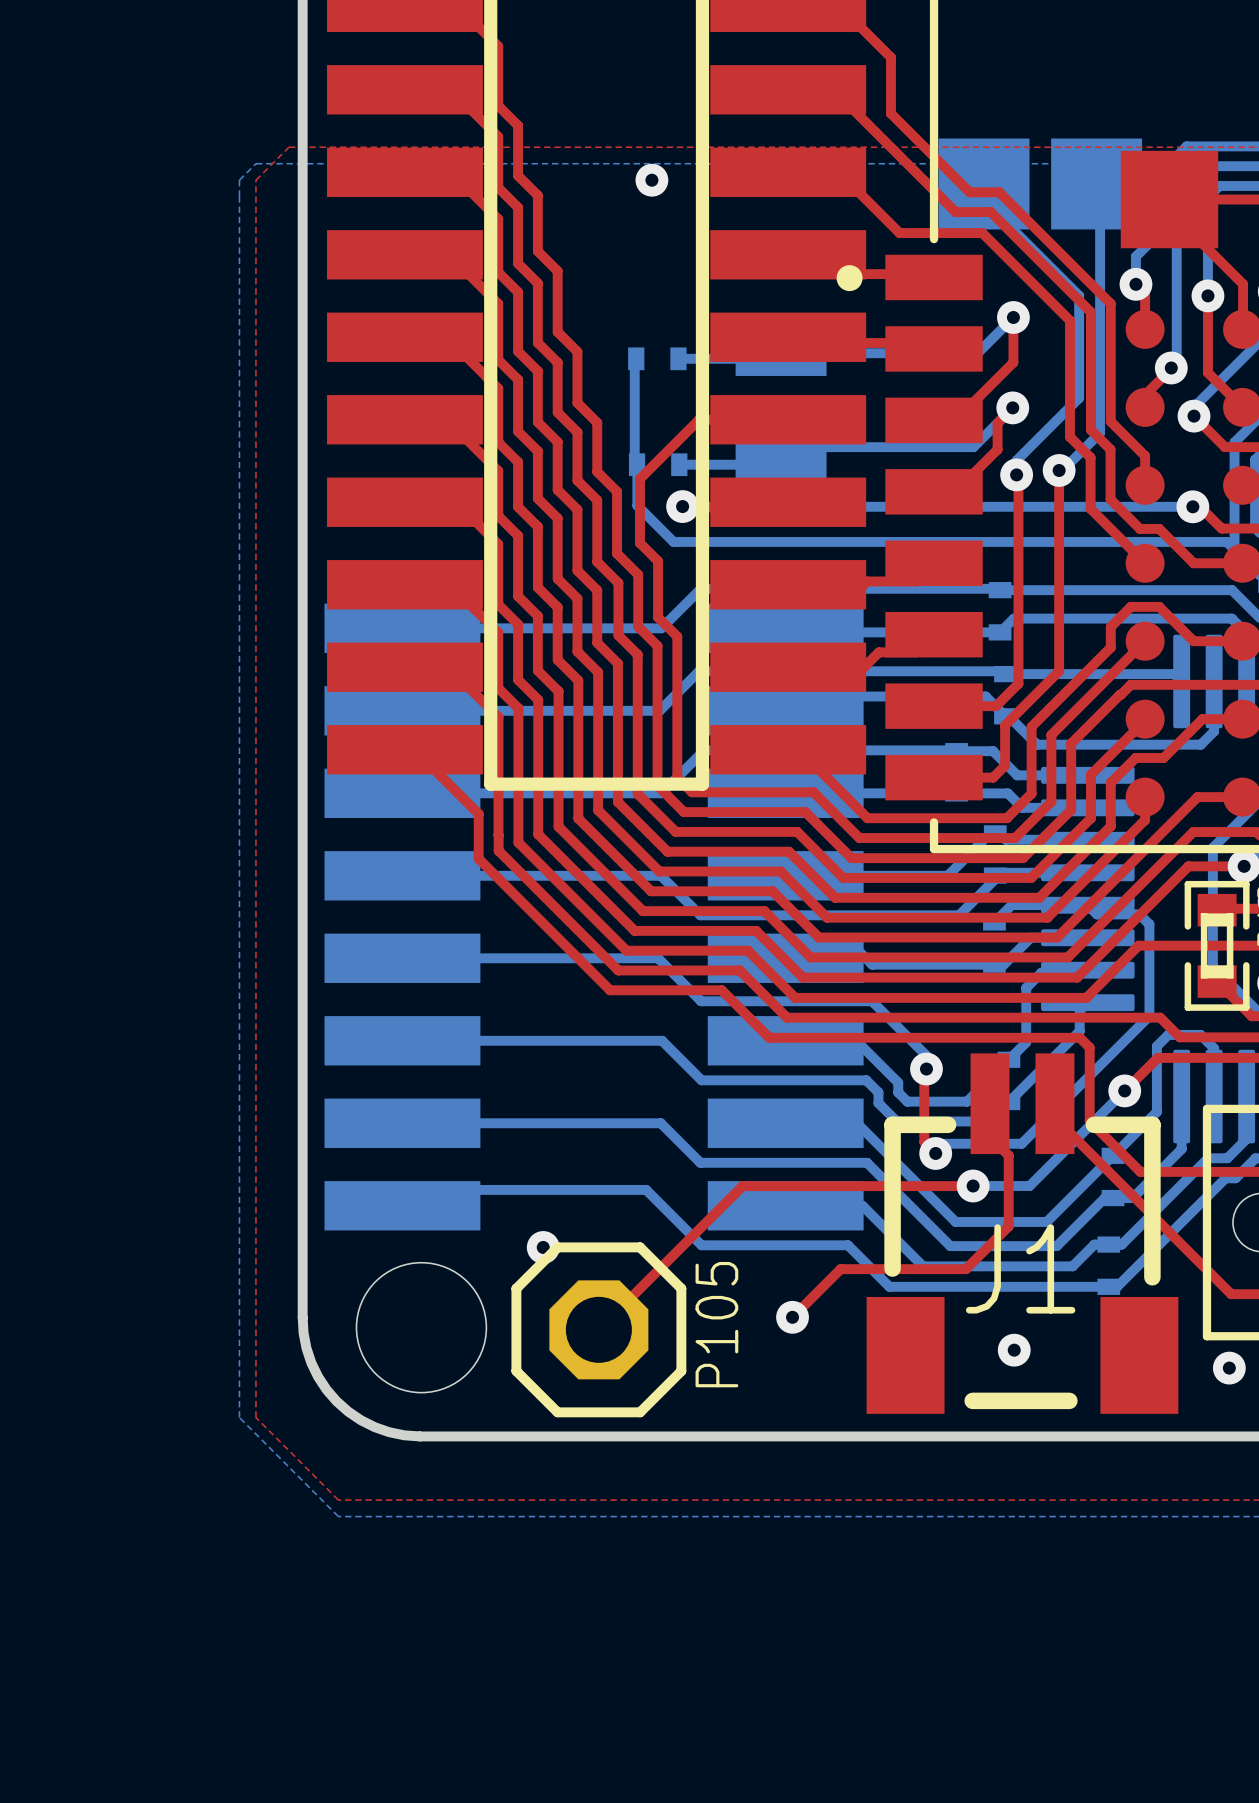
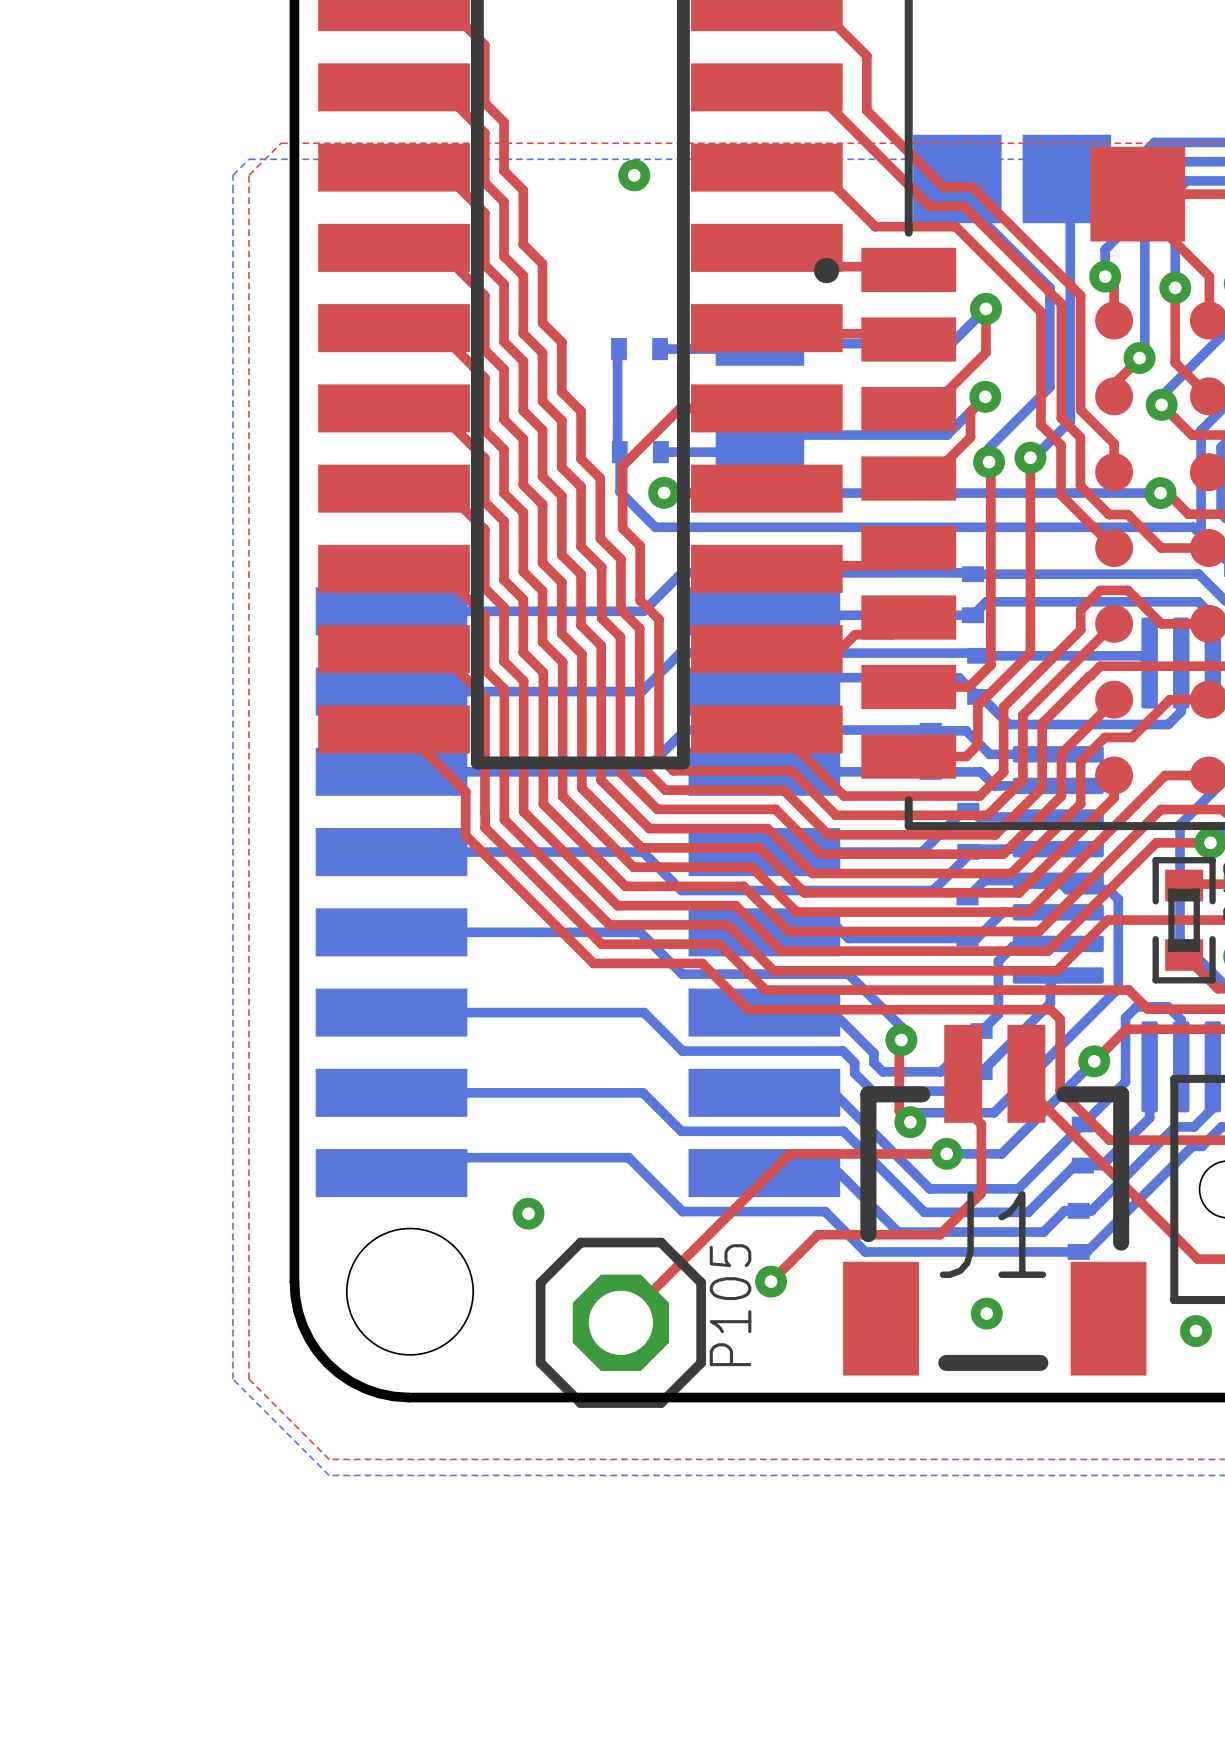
top track: (811, 1186) (742, 1186) (598, 1329) -> (789, 1153) (620, 1322)
text position: P105 (716, 1324) -> P105 (730, 1305)
part position: (598, 1329) -> (620, 1322)

